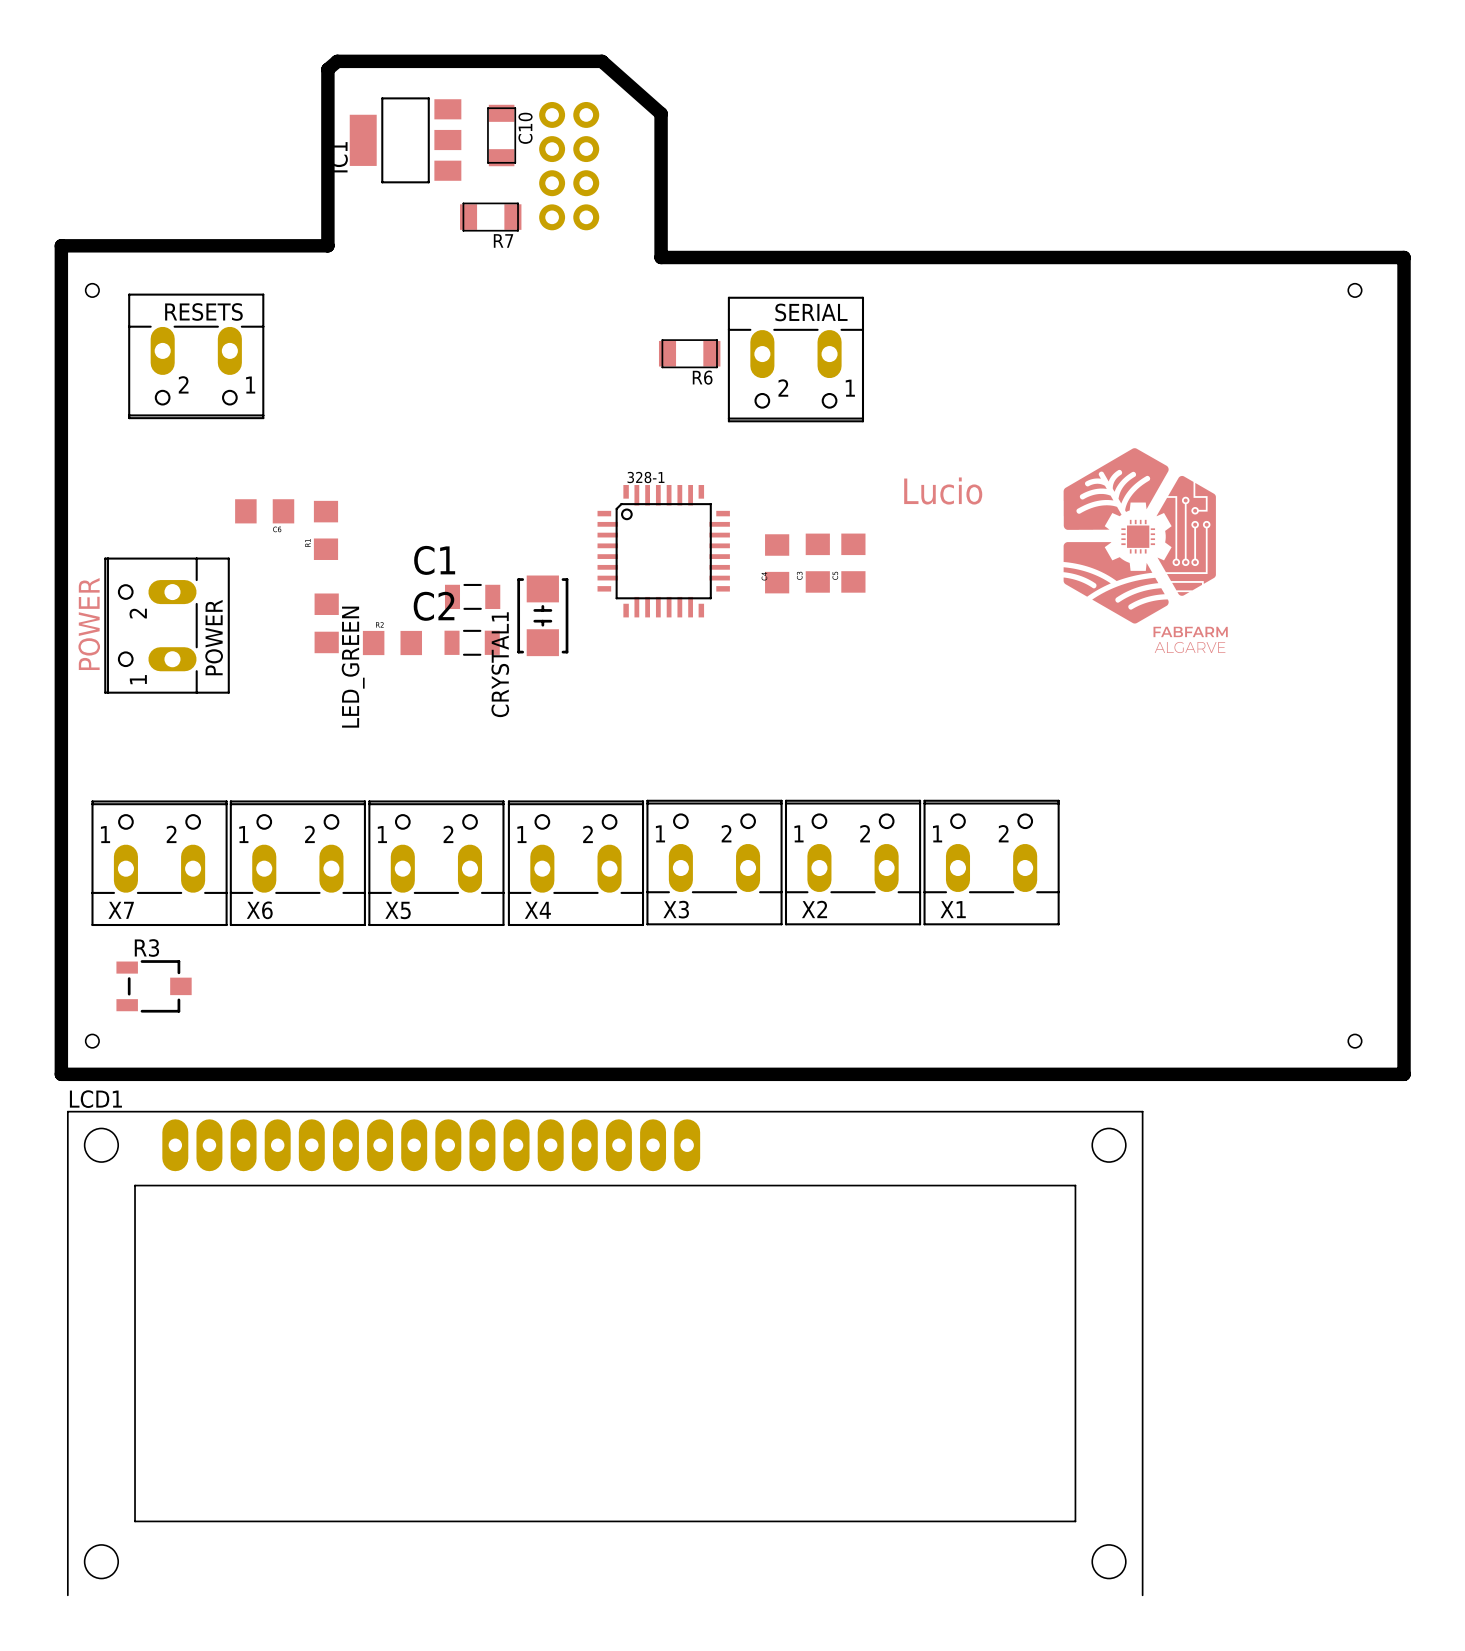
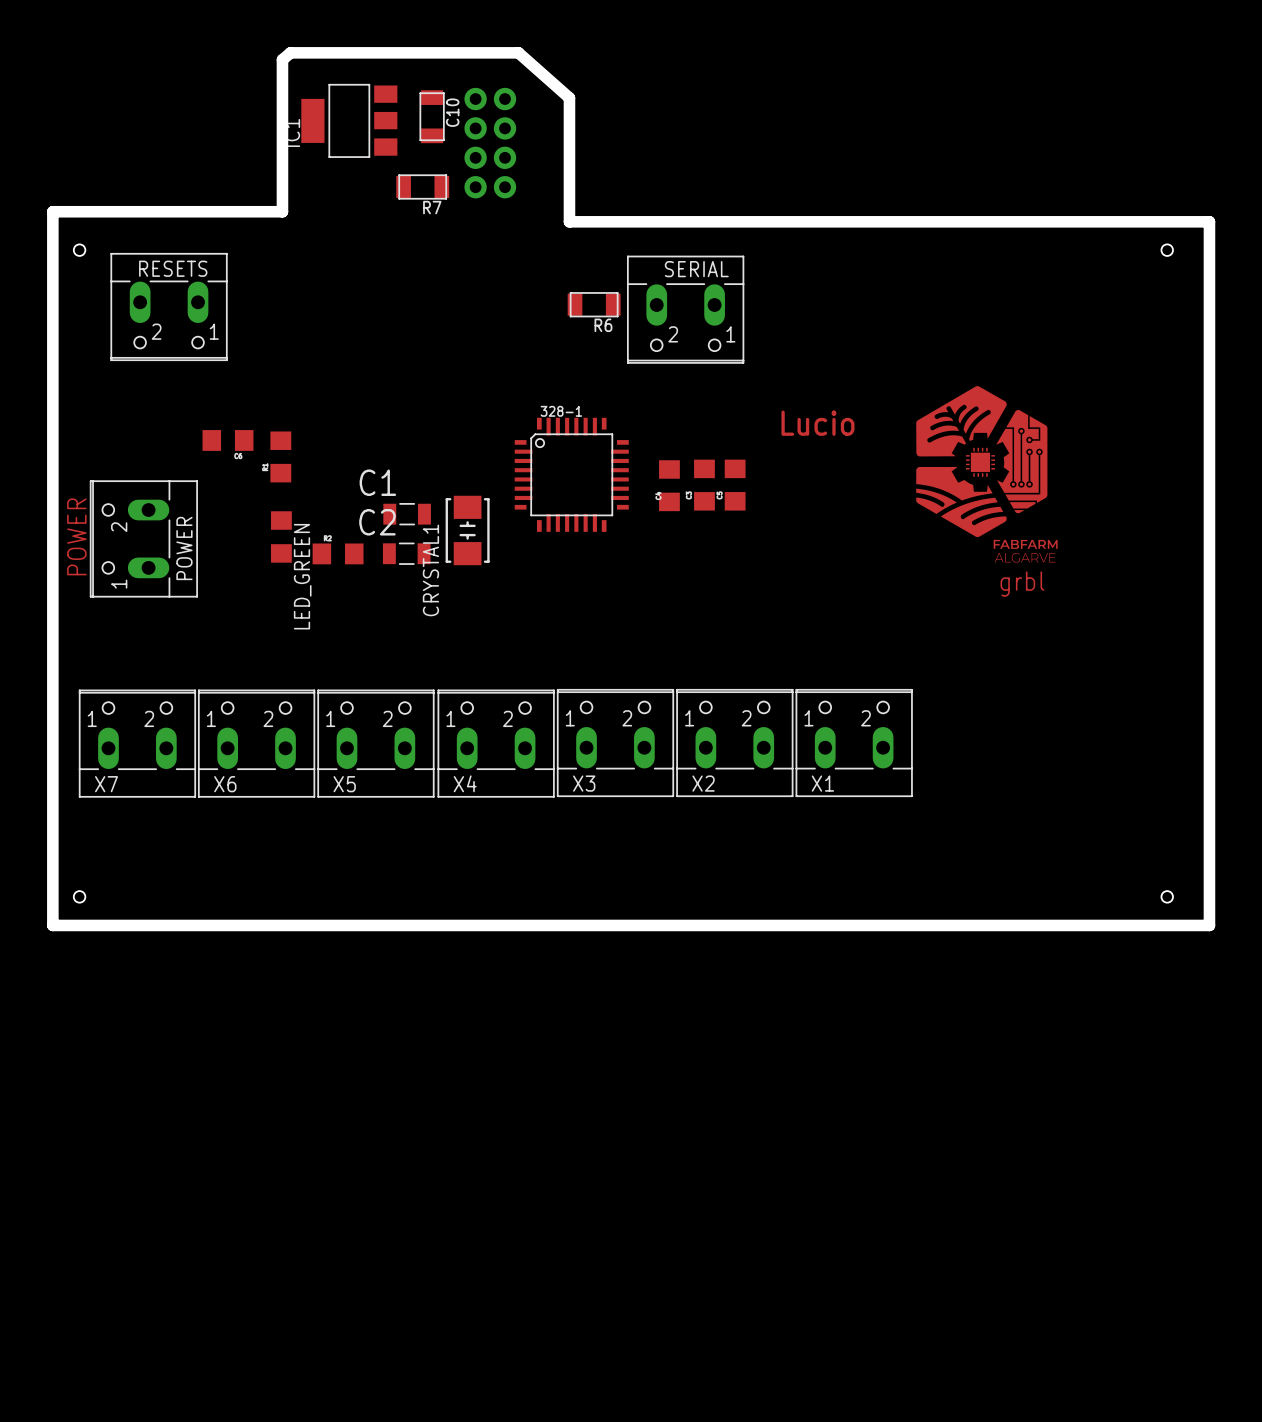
text: none -> grbl (1022, 584)
R3: (154, 986) -> none
LCD1: (605, 1353) -> none

